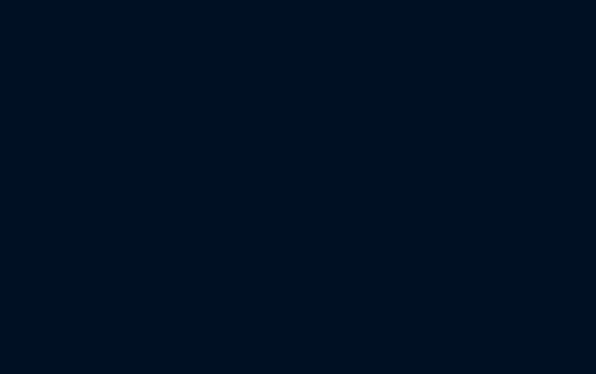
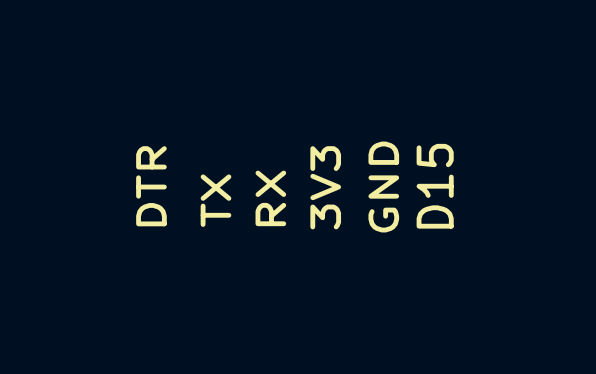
text: none -> DTR (151, 186)
text: none -> D15 (435, 186)
text: none -> 3V3 (325, 187)
text: none -> GND (383, 187)
text: none -> RX (270, 198)
text: none -> TX (215, 200)

